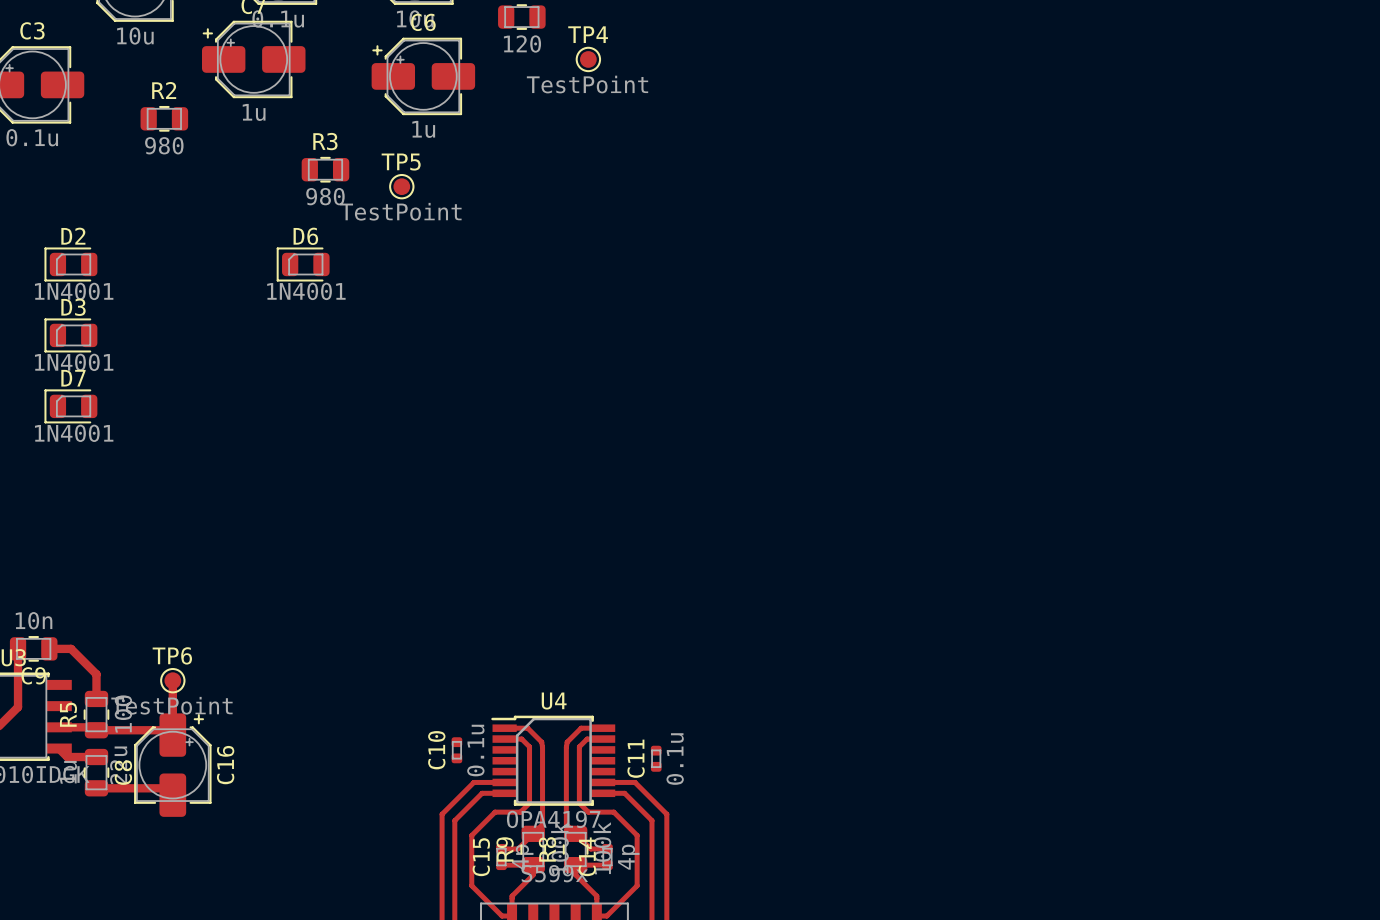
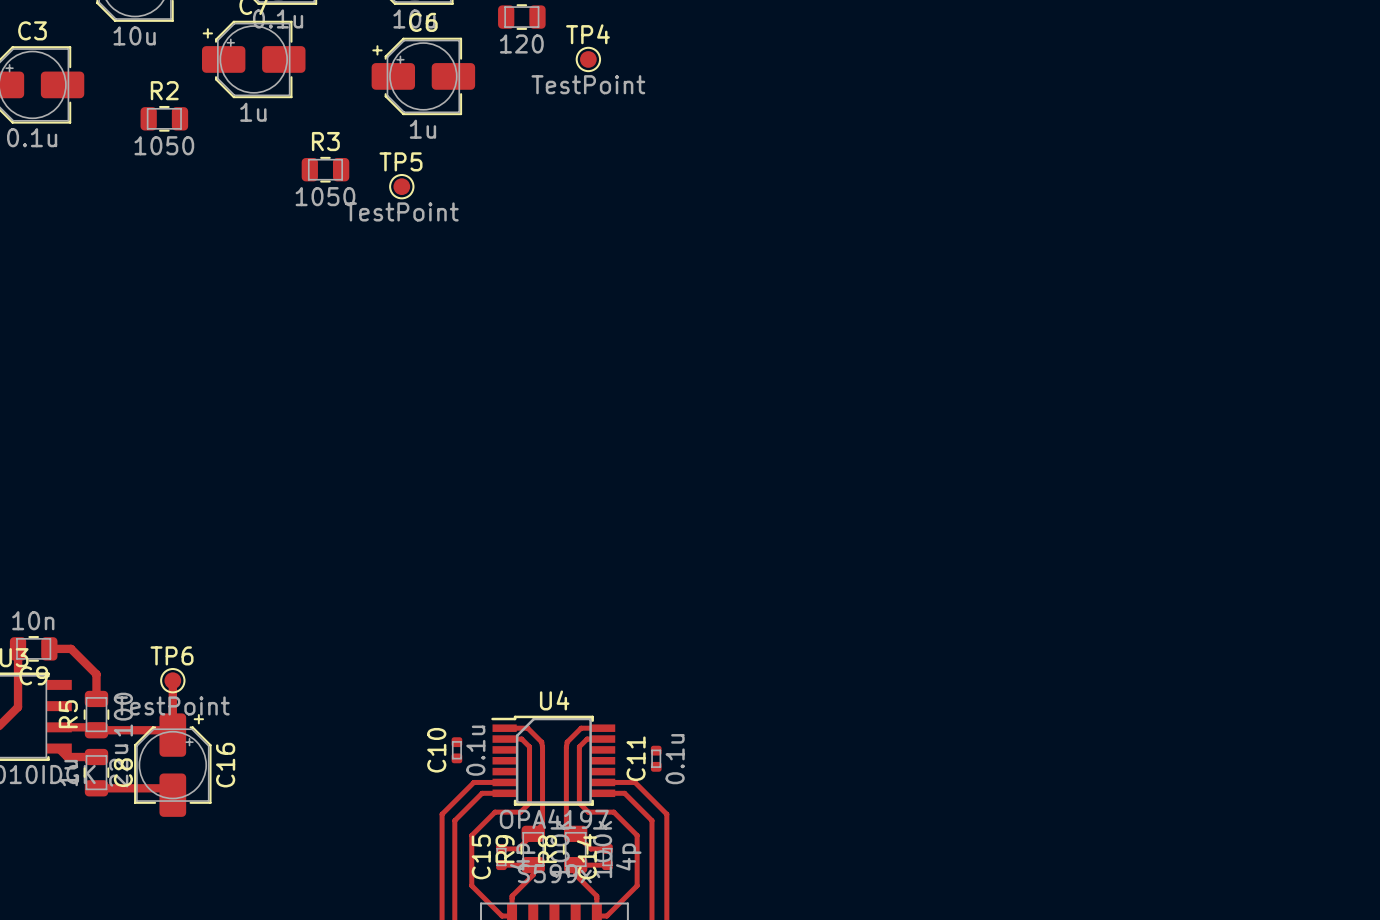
R2 value: 980 (164, 145) -> 1050 (164, 145)
R3 value: 980 (325, 196) -> 1050 (325, 196)
D2: 1N4001 (70, 264) -> none
D6: 1N4001 (303, 264) -> none
D3: 1N4001 (70, 335) -> none
D7: 1N4001 (70, 406) -> none

